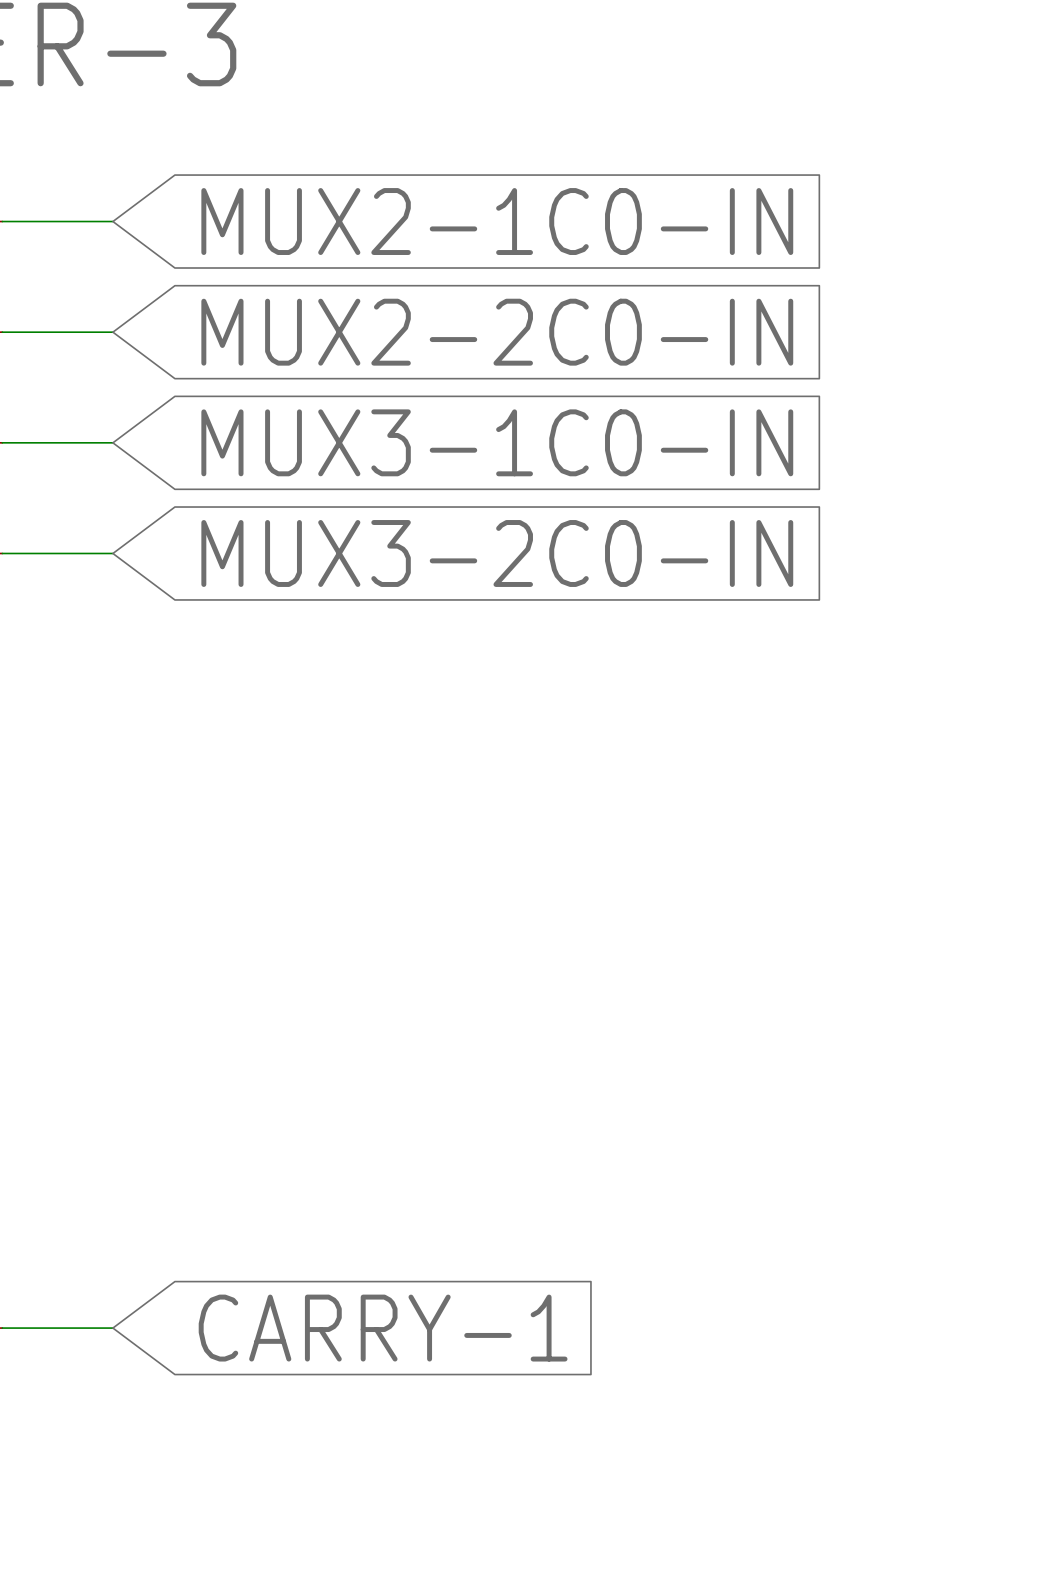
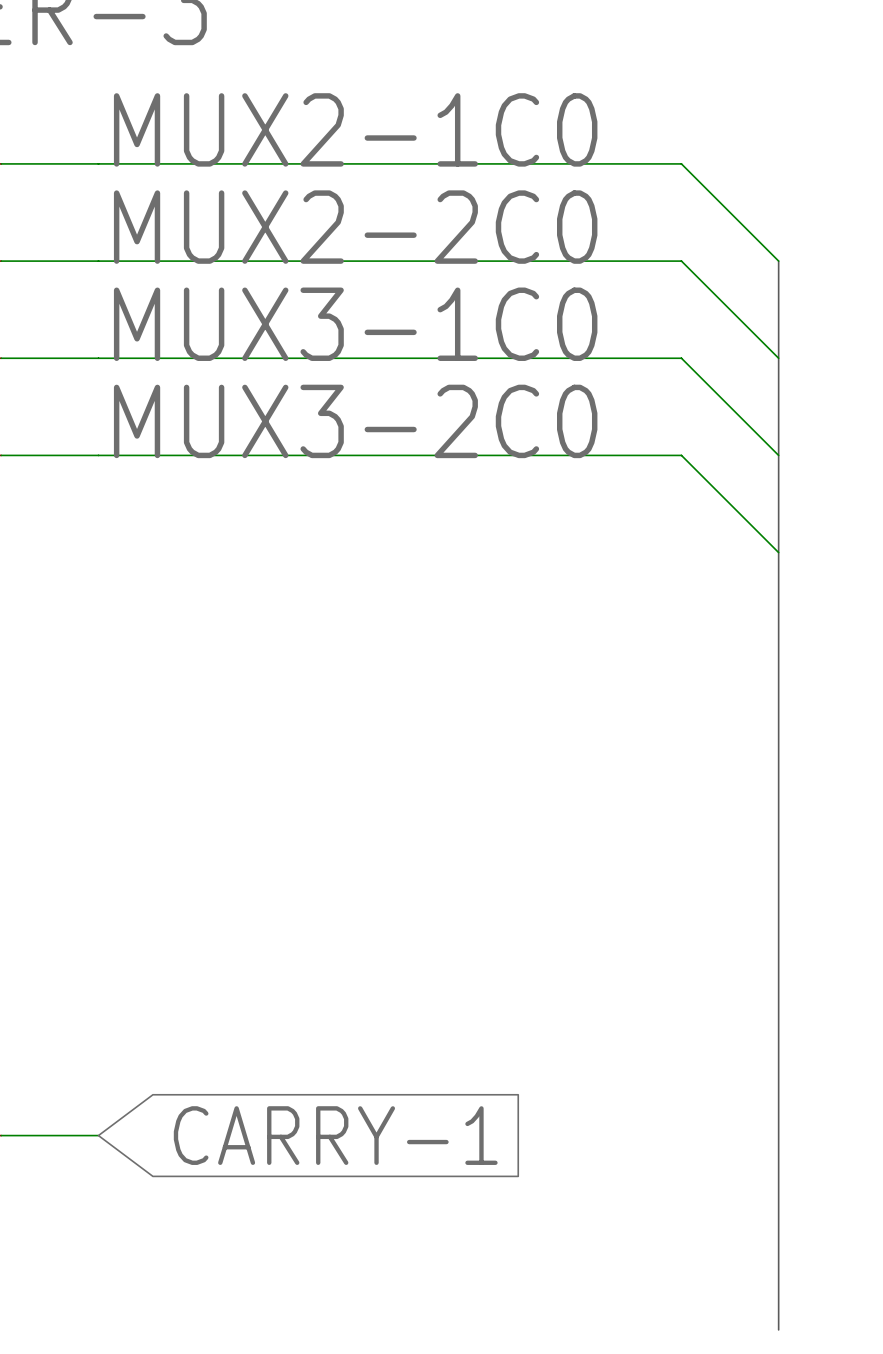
label: none -> MUX2-1C0 (355, 129)
wire: none -> (98, 163) (681, 163) (778, 261)
global label: MUX2-1C0-IN (497, 221) -> none
label: none -> MUX2-2C0 (355, 227)
wire: none -> (98, 261) (681, 261) (778, 358)
global label: MUX2-2C0-IN (497, 332) -> none
bus: none -> (778, 261) (778, 1329)
label: none -> MUX3-1C0 (355, 324)
wire: none -> (98, 358) (681, 358) (778, 455)
global label: MUX3-1C0-IN (497, 442) -> none
label: none -> MUX3-2C0 (355, 421)
wire: none -> (98, 455) (681, 455) (778, 552)
global label: MUX3-2C0-IN (497, 553) -> none

